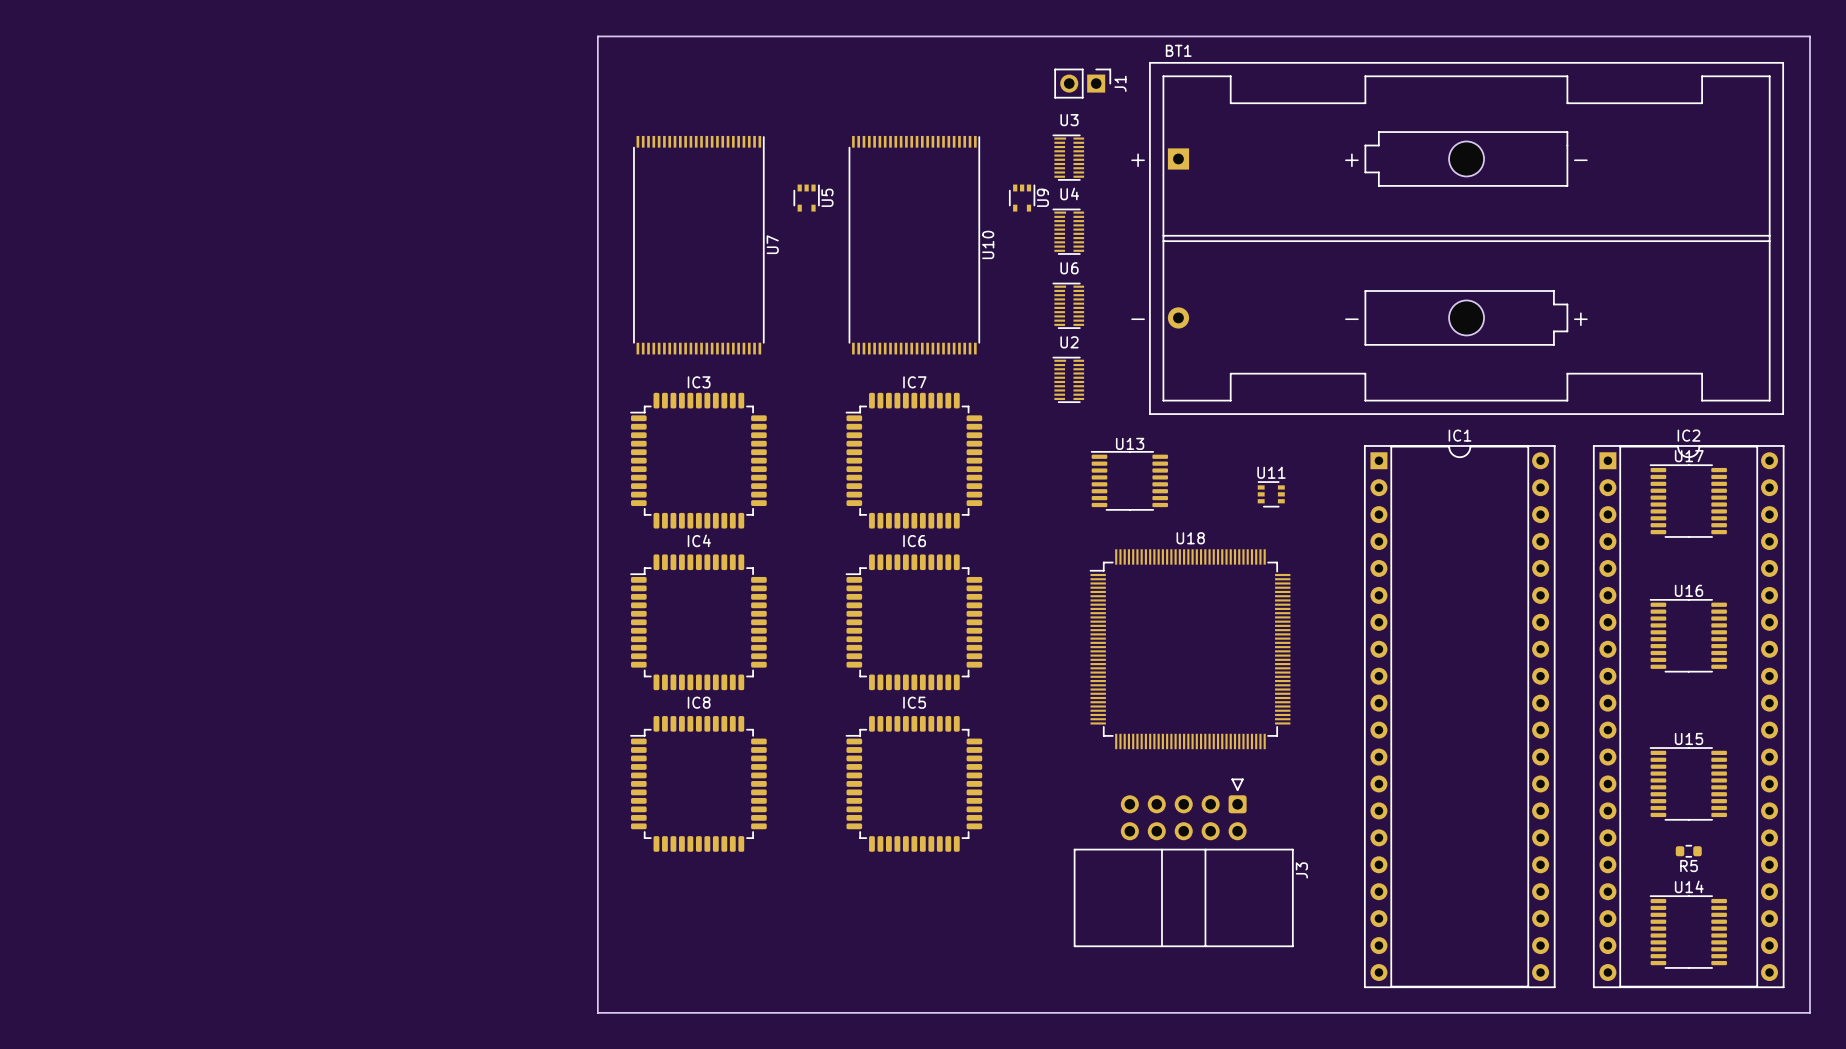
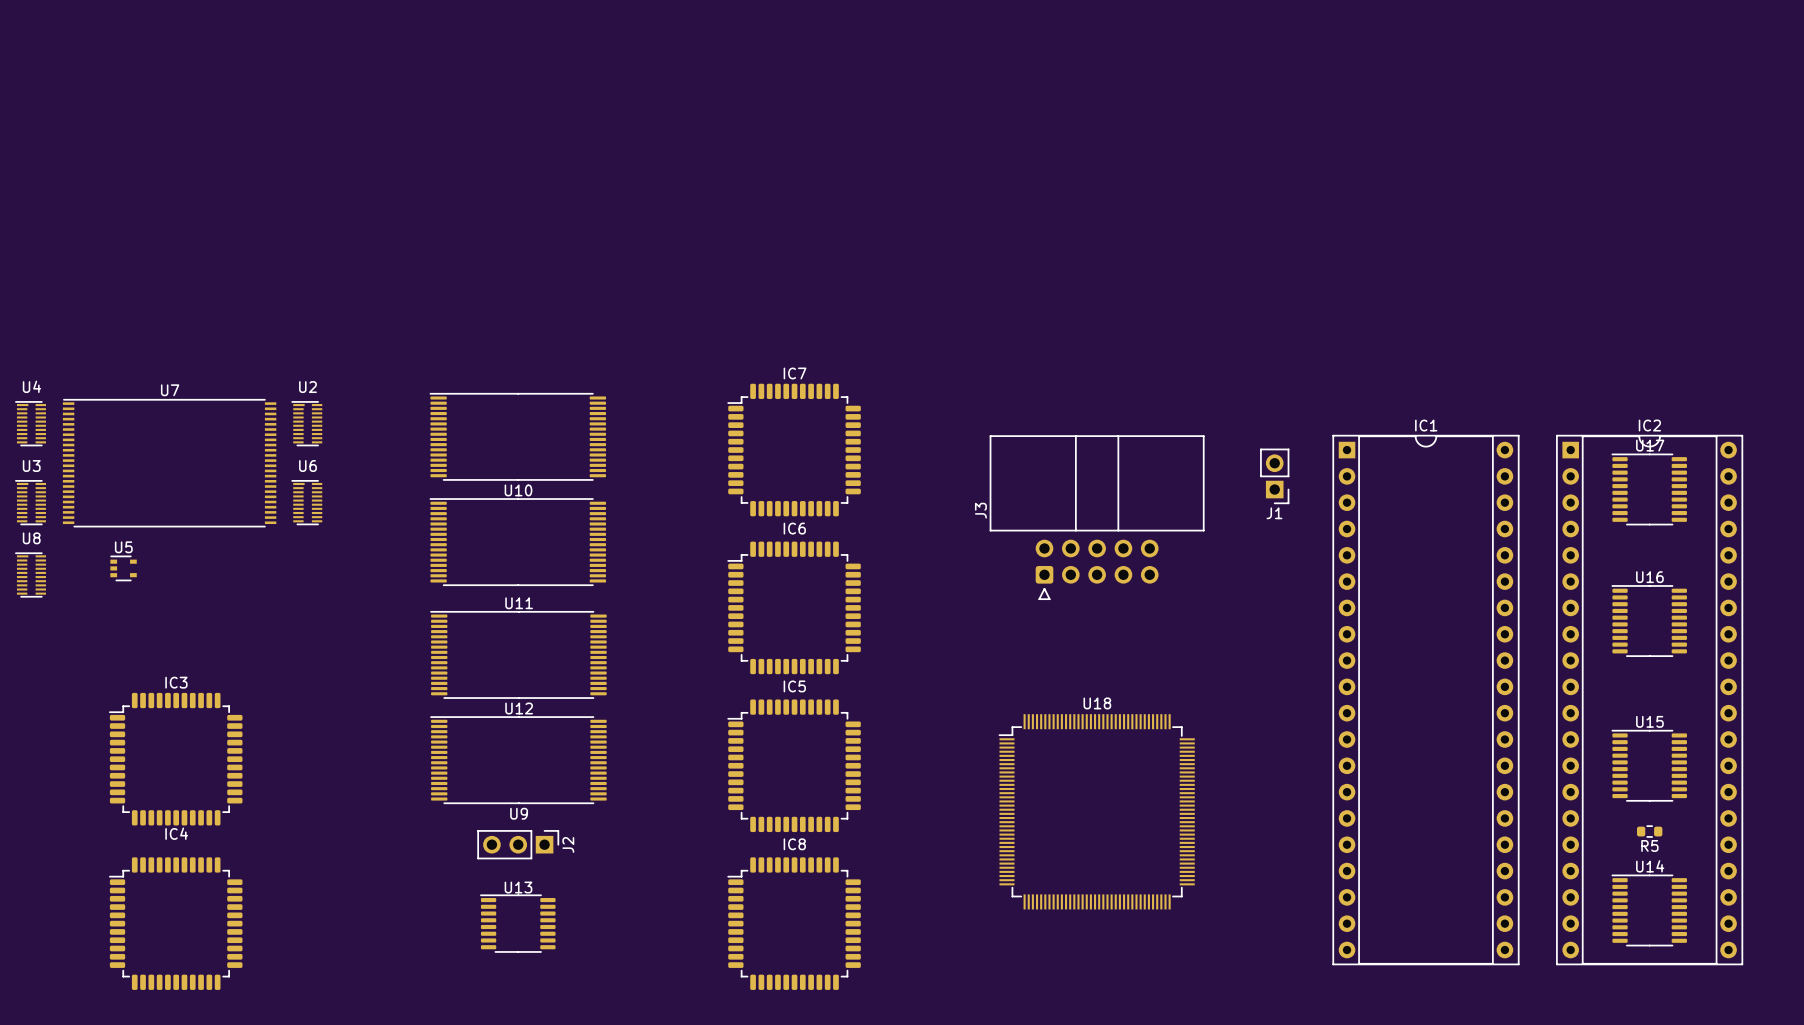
board edge: (597, 36) (597, 1012) (1809, 1012) (1809, 36) (597, 36) -> none
J1 rotation: 0° (1082, 83) -> 90° clockwise (1274, 476)
J1 position: (1082, 83) -> (1274, 476)
U10 footprint: [848, 135, 980, 355] -> [429, 498, 607, 586]
U3 position: (1068, 157) -> (30, 502)
U9 footprint: [1009, 184, 1036, 212] -> [429, 393, 607, 481]
U9 name position: U9 (1042, 197) -> U9 (519, 813)
U5 rotation: 0° (806, 198) -> 90° counterclockwise (123, 568)
U5 position: (806, 198) -> (123, 568)
U4 position: (1068, 231) -> (30, 423)
BT1: (1466, 238) -> none
U10 name position: U10 (988, 244) -> U10 (518, 490)
U7 rotation: 0° (698, 245) -> 90° counterclockwise (169, 463)
U7 position: (698, 245) -> (169, 463)
U6 position: (1068, 305) -> (306, 502)
U2 position: (1068, 379) -> (306, 423)
IC3 position: (698, 460) -> (175, 759)
IC7 position: (914, 460) -> (794, 450)
U11 name position: U11 (1271, 472) -> U11 (519, 603)
U13 position: (1129, 480) -> (517, 923)
U11 footprint: [1257, 481, 1285, 508] -> [430, 611, 607, 699]
IC4 name position: IC4 (699, 540) -> IC4 (176, 833)
U8: none -> (30, 575)
IC4 position: (698, 622) -> (175, 923)
IC6 position: (914, 622) -> (794, 607)
U18 position: (1190, 649) -> (1096, 811)
U12: none -> (518, 760)
IC8 position: (698, 783) -> (794, 923)
IC5 position: (914, 783) -> (794, 765)
J3 rotation: 0° (1183, 862) -> 180° (1097, 517)
J3 position: (1183, 862) -> (1097, 517)
J2: none -> (518, 844)

